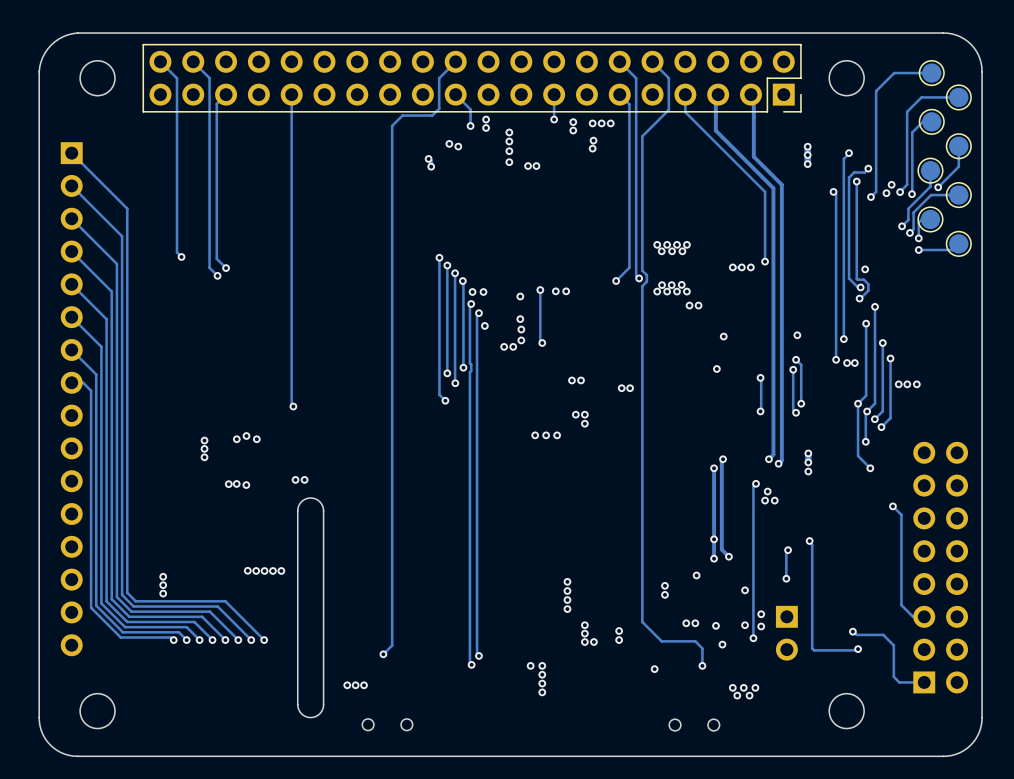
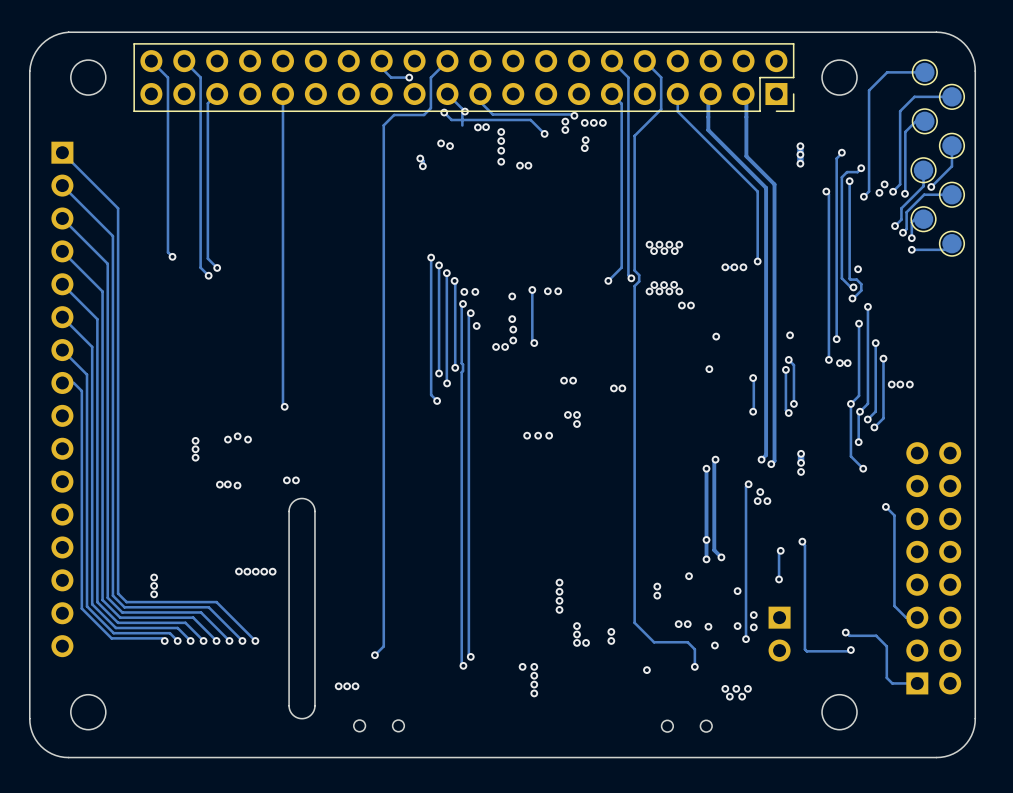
track: none -> (381, 61) (381, 68) (391, 77) (409, 77)
via: none -> (409, 77)
track: none -> (480, 94) (480, 102) (492, 114) (574, 115)
track: (554, 94) (554, 117) -> none
via: none -> (465, 111)
track: none -> (444, 112) (451, 119) (530, 119) (544, 133)
via: none -> (444, 112)
via: none -> (574, 115)
via: (486, 119) -> none
via: (554, 119) -> none
via: (470, 126) -> none
via: none -> (486, 127)
via: none -> (544, 133)

